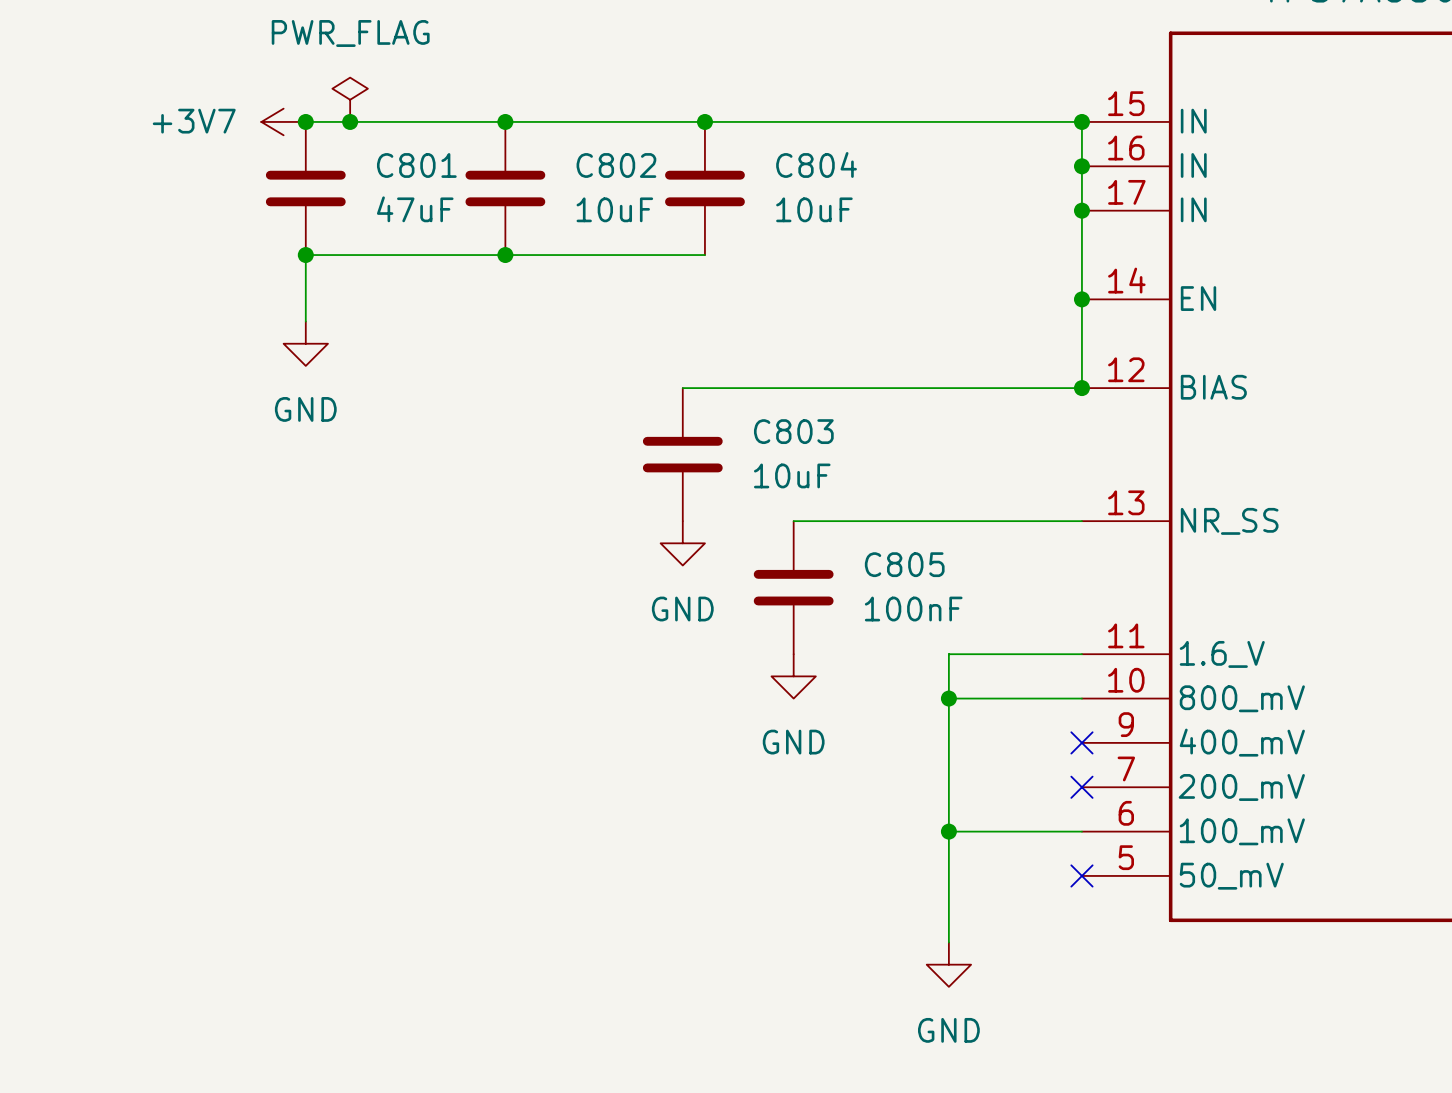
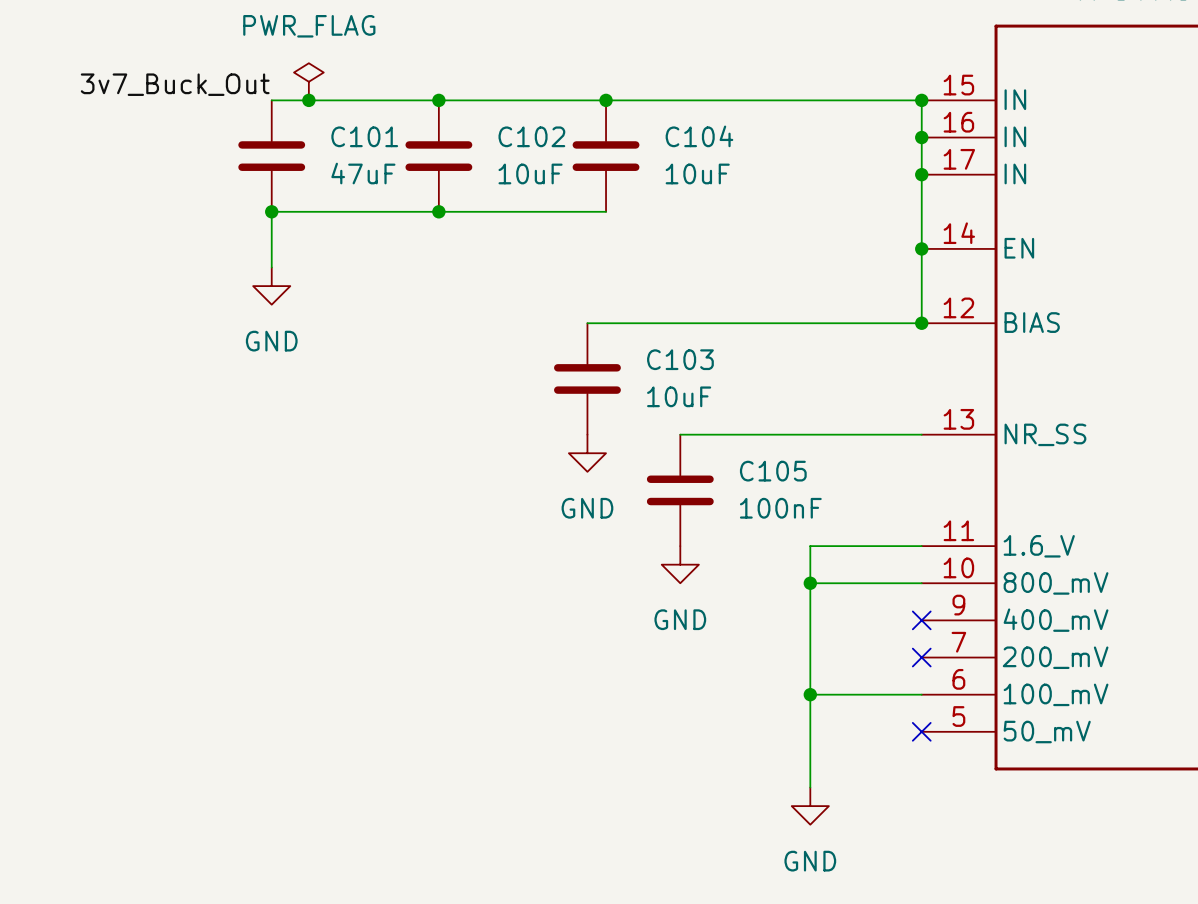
label: none -> 3v7_Buck_Out (175, 84)
power symbol: +3V7 (283, 121) -> none
junction: (305, 121) -> none
C804 name: C804 (816, 164) -> C104 (699, 136)
C801 name: C801 (416, 165) -> C101 (364, 136)
C802 name: C802 (616, 165) -> C102 (531, 136)
C803 name: C803 (793, 431) -> C103 (680, 359)
C805 name: C805 (904, 564) -> C105 (773, 471)

